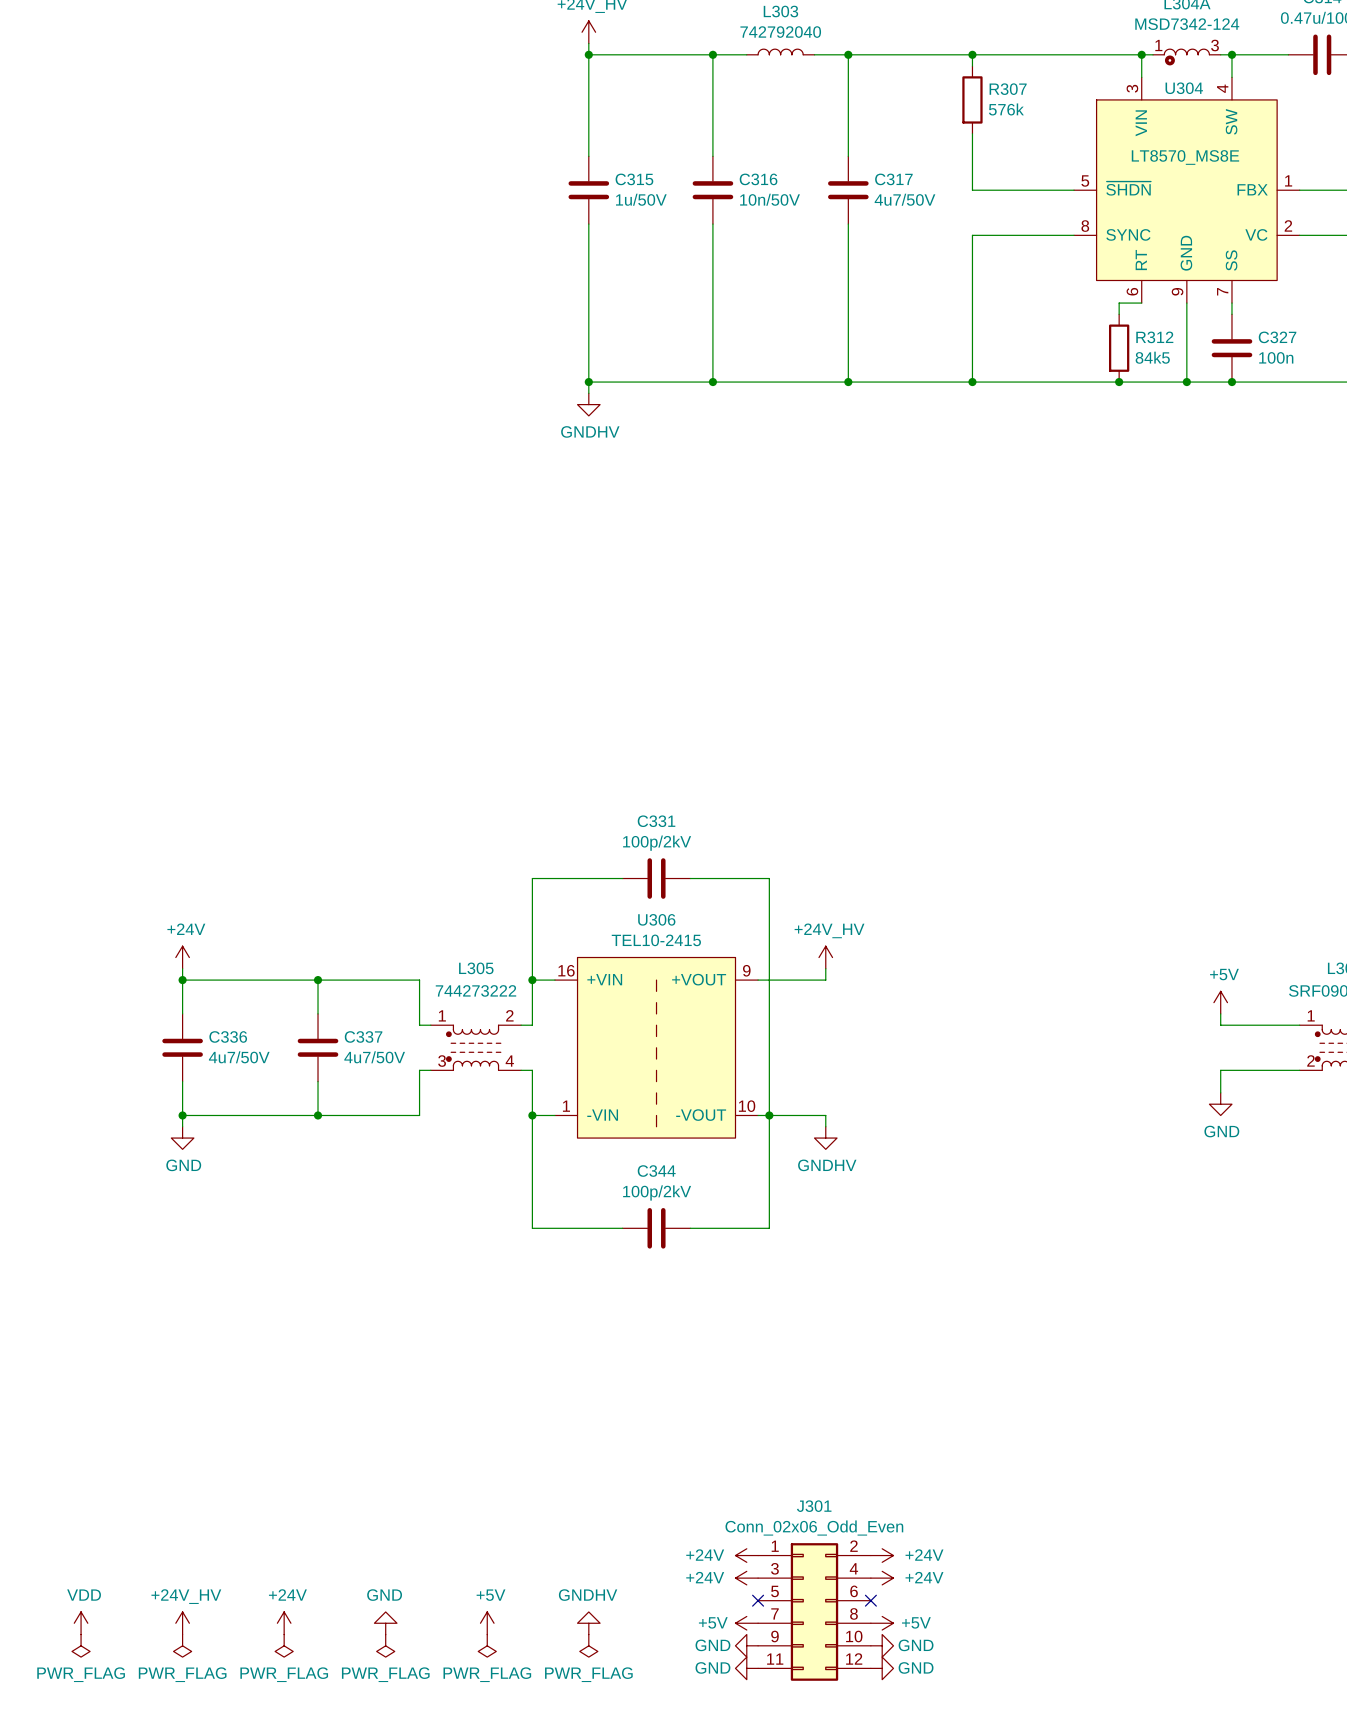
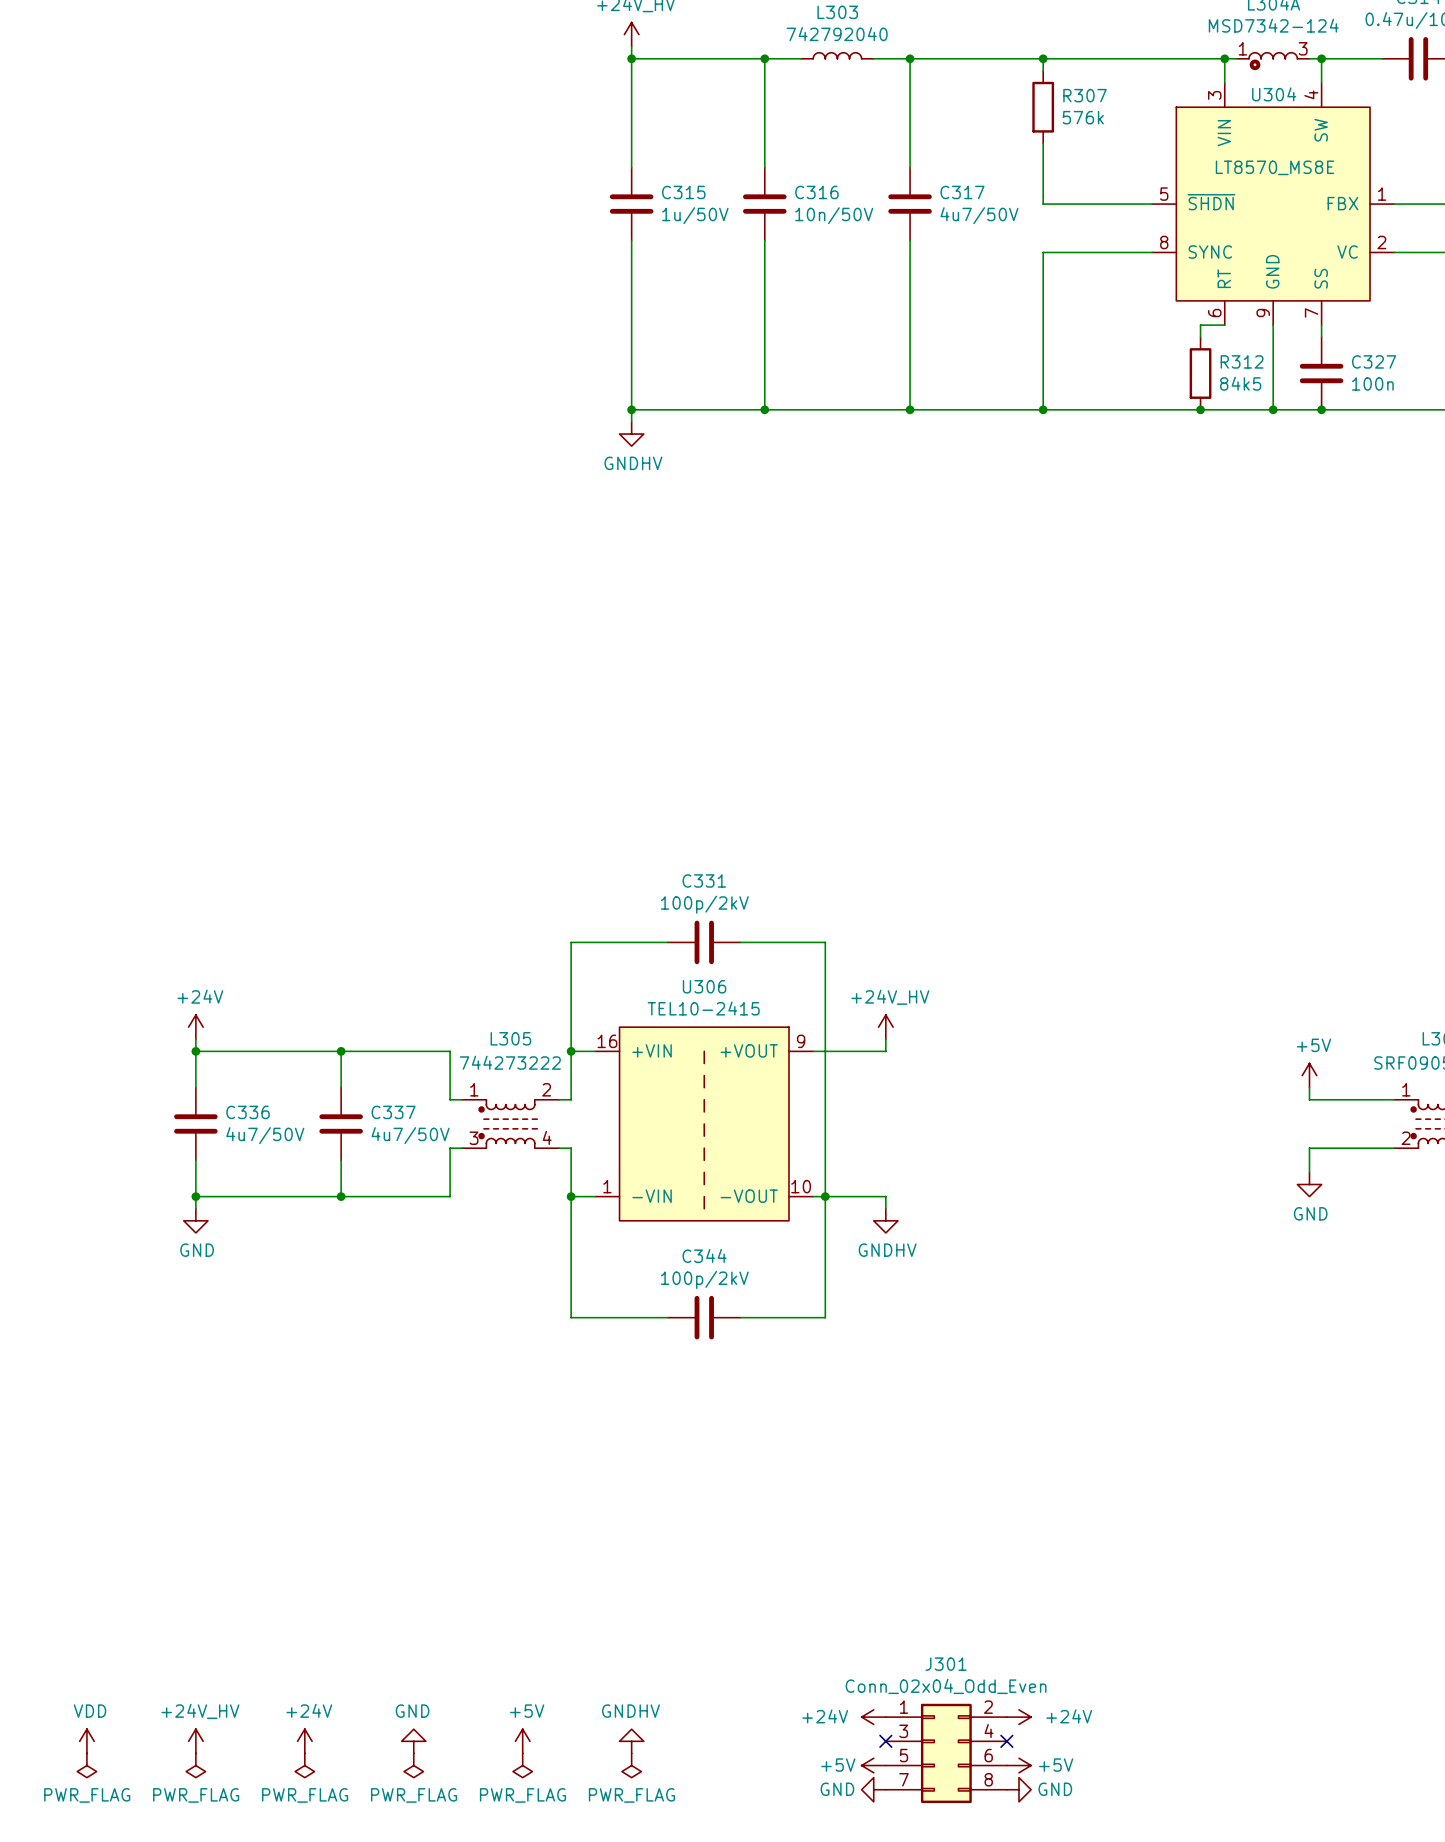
J301 name position: J301 (814, 1506) -> J301 (946, 1664)
J301 value: Conn_02x06_Odd_Even (814, 1528) -> Conn_02x04_Odd_Even (946, 1686)
J301 symbol: [758, 1543, 871, 1681] -> [885, 1703, 1007, 1804]
power symbol: +24V (746, 1555) -> none
power symbol: +24V (882, 1555) -> none
power symbol: +24V (746, 1578) -> none
power symbol: +24V (882, 1578) -> none
no-connect mark: (758, 1600) -> none
power symbol: none -> +24V (873, 1717)
no-connect mark: (870, 1600) -> none
power symbol: none -> +24V (1018, 1717)
power symbol: +5V (746, 1623) -> none
no-connect mark: none -> (885, 1741)
power symbol: +5V (882, 1623) -> none
no-connect mark: none -> (1006, 1741)
power symbol: GND (746, 1645) -> none
power symbol: none -> +5V (873, 1765)
power symbol: GND (882, 1645) -> none
power symbol: none -> +5V (1018, 1765)
power symbol: GND (746, 1668) -> none
power symbol: none -> GND (873, 1789)
power symbol: GND (882, 1668) -> none
power symbol: none -> GND (1018, 1789)

